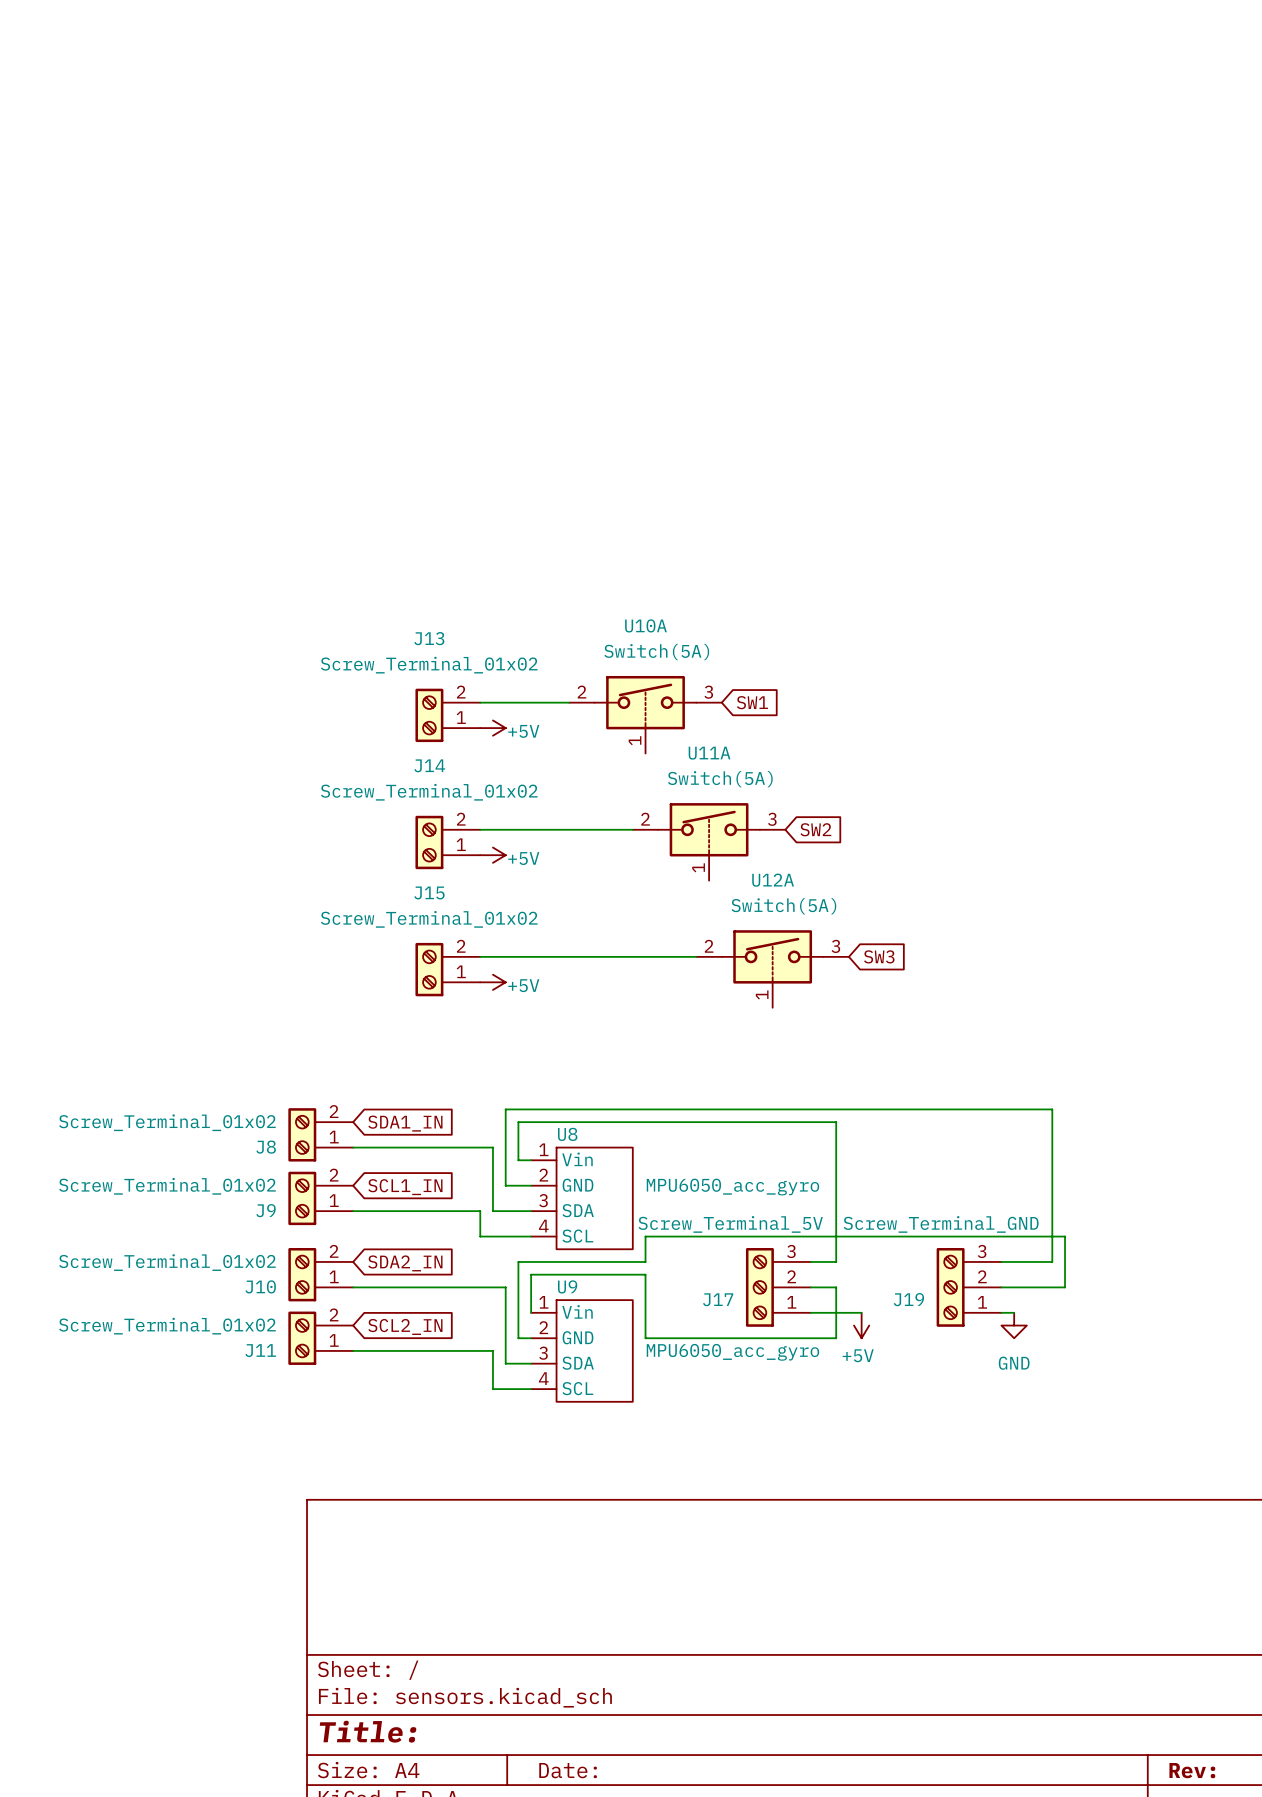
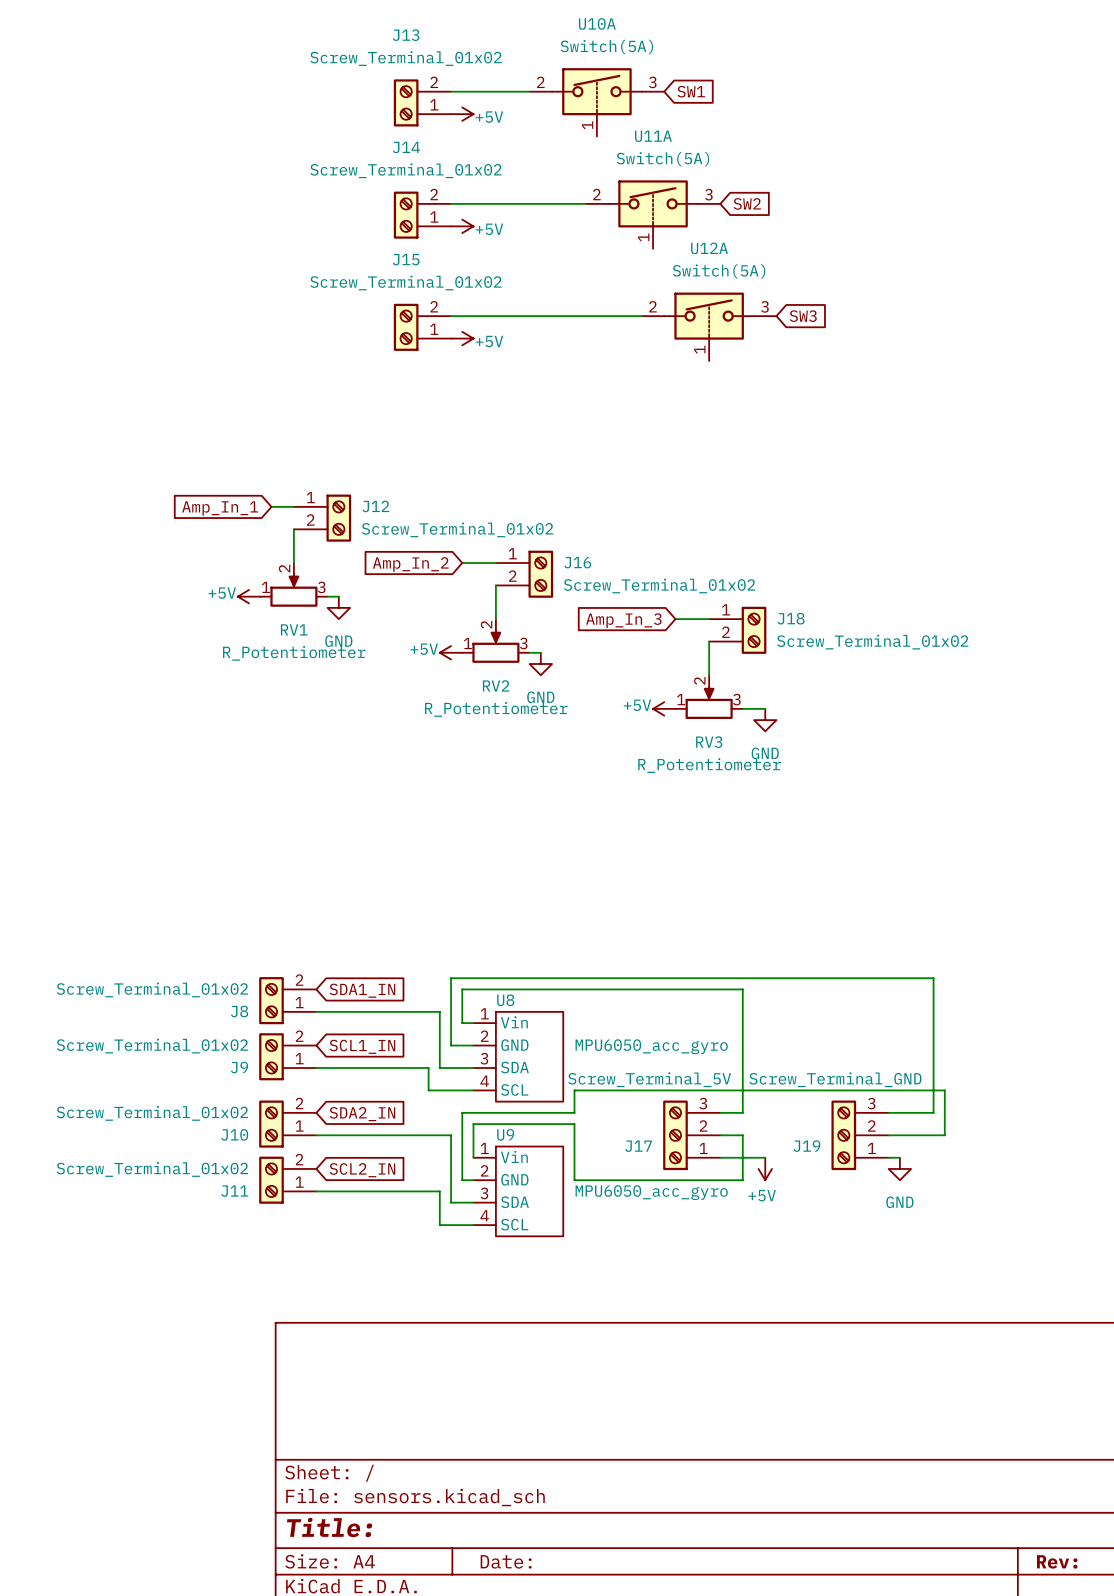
wire: none -> (451, 91) (529, 91)
global label: none -> SW1 (691, 91)
power symbol: none -> +5V (462, 114)
wire: none -> (451, 203) (585, 203)
global label: none -> SW2 (747, 203)
power symbol: none -> +5V (462, 226)
wire: none -> (451, 316) (641, 316)
global label: none -> SW3 (803, 316)
power symbol: none -> +5V (462, 338)
wire: none -> (271, 506) (293, 506)
global label: none -> Amp_In_1 (220, 508)
J12: none -> Screw_Terminal_01x02 (322, 518)
wire: none -> (293, 529) (293, 563)
wire: none -> (462, 563) (495, 563)
global label: none -> Amp_In_2 (410, 564)
J16: none -> Screw_Terminal_01x02 (524, 574)
RV1: none -> R_Potentiometer (293, 584)
wire: none -> (495, 585) (495, 619)
power symbol: none -> +5V (249, 596)
wire: none -> (327, 596) (338, 596)
power symbol: none -> GND (338, 607)
wire: (480, 702) (569, 702) -> none
global label: SW1 (752, 702) -> none
wire: none -> (675, 619) (709, 619)
global label: none -> Amp_In_3 (623, 620)
U10A position: (645, 714) -> (596, 102)
J13 position: (447, 715) -> (422, 102)
J18: none -> Screw_Terminal_01x02 (737, 630)
RV2: none -> R_Potentiometer (495, 640)
power symbol rotation: 0° (492, 728) -> 180° (451, 652)
power symbol position: +5V (492, 728) -> +5V (451, 652)
wire: none -> (709, 641) (709, 675)
wire: none -> (529, 652) (540, 652)
power symbol: none -> GND (540, 664)
RV3: none -> R_Potentiometer (709, 697)
power symbol: none -> +5V (664, 708)
wire: none -> (742, 708) (765, 708)
power symbol: none -> GND (765, 720)
wire: (480, 829) (632, 829) -> none
global label: SW2 (815, 829) -> none
U11A position: (709, 841) -> (653, 214)
J14 position: (447, 842) -> (422, 215)
power symbol: +5V (492, 855) -> none
wire: (480, 956) (696, 956) -> none
global label: SW3 (879, 956) -> none
U12A position: (772, 968) -> (709, 326)
J15 position: (447, 969) -> (422, 327)
power symbol: +5V (492, 982) -> none

